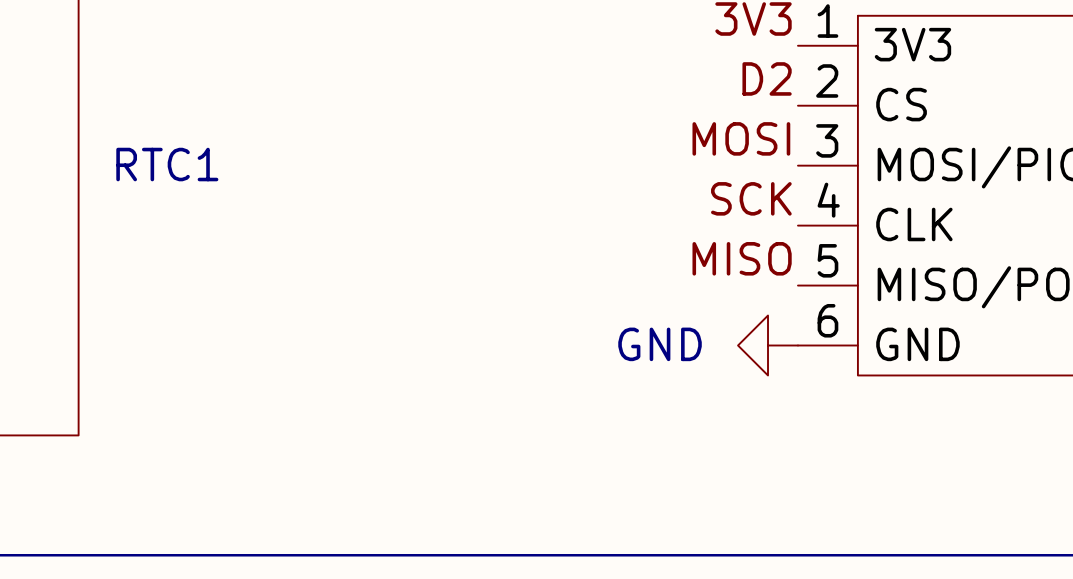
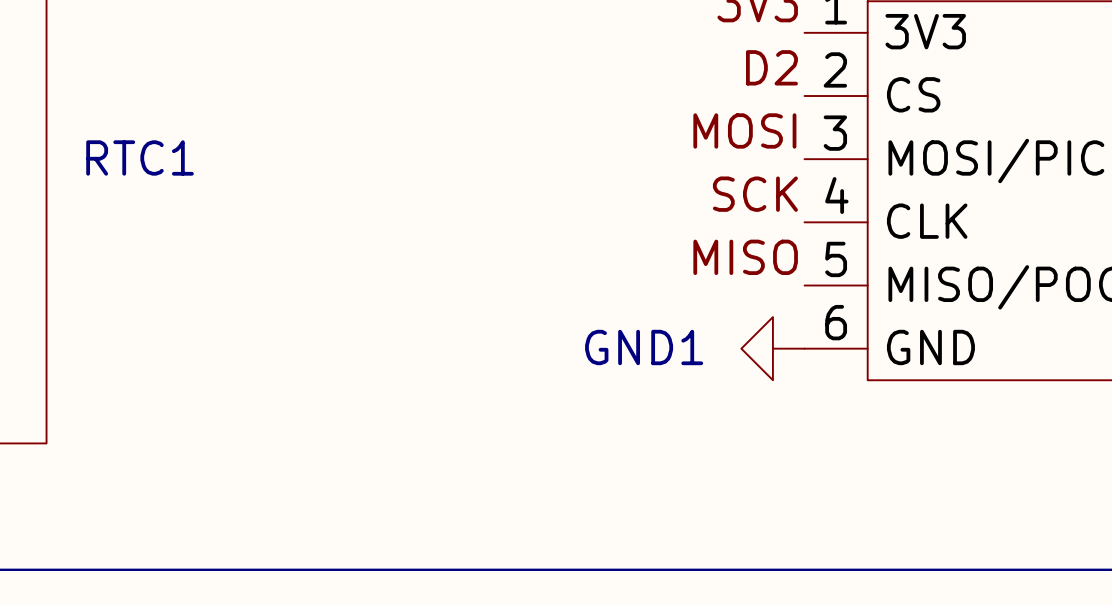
power symbol: GND (768, 345) -> GND1 (772, 348)

